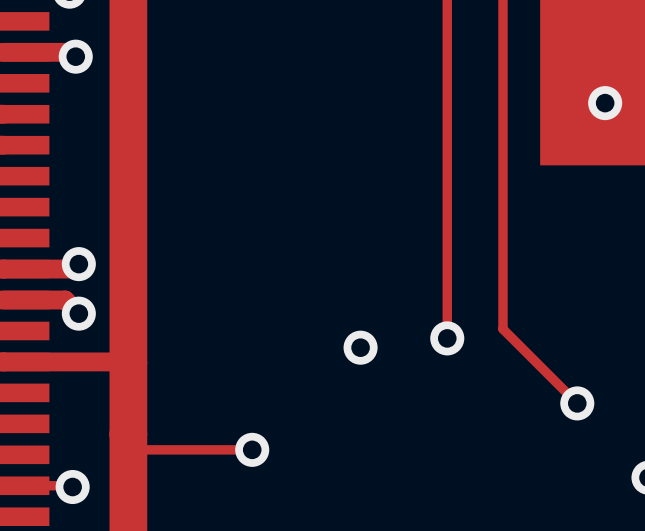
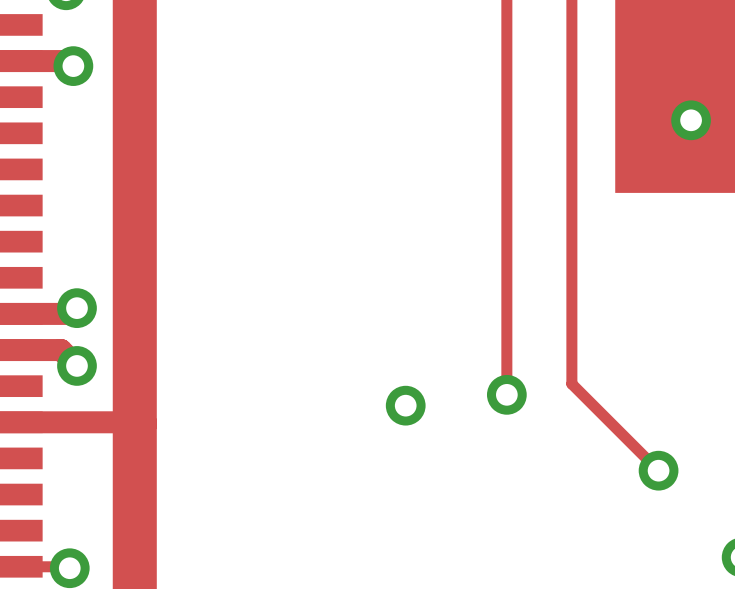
track: (128, 434) (143, 449) (252, 449) -> none
via: (252, 449) -> none

